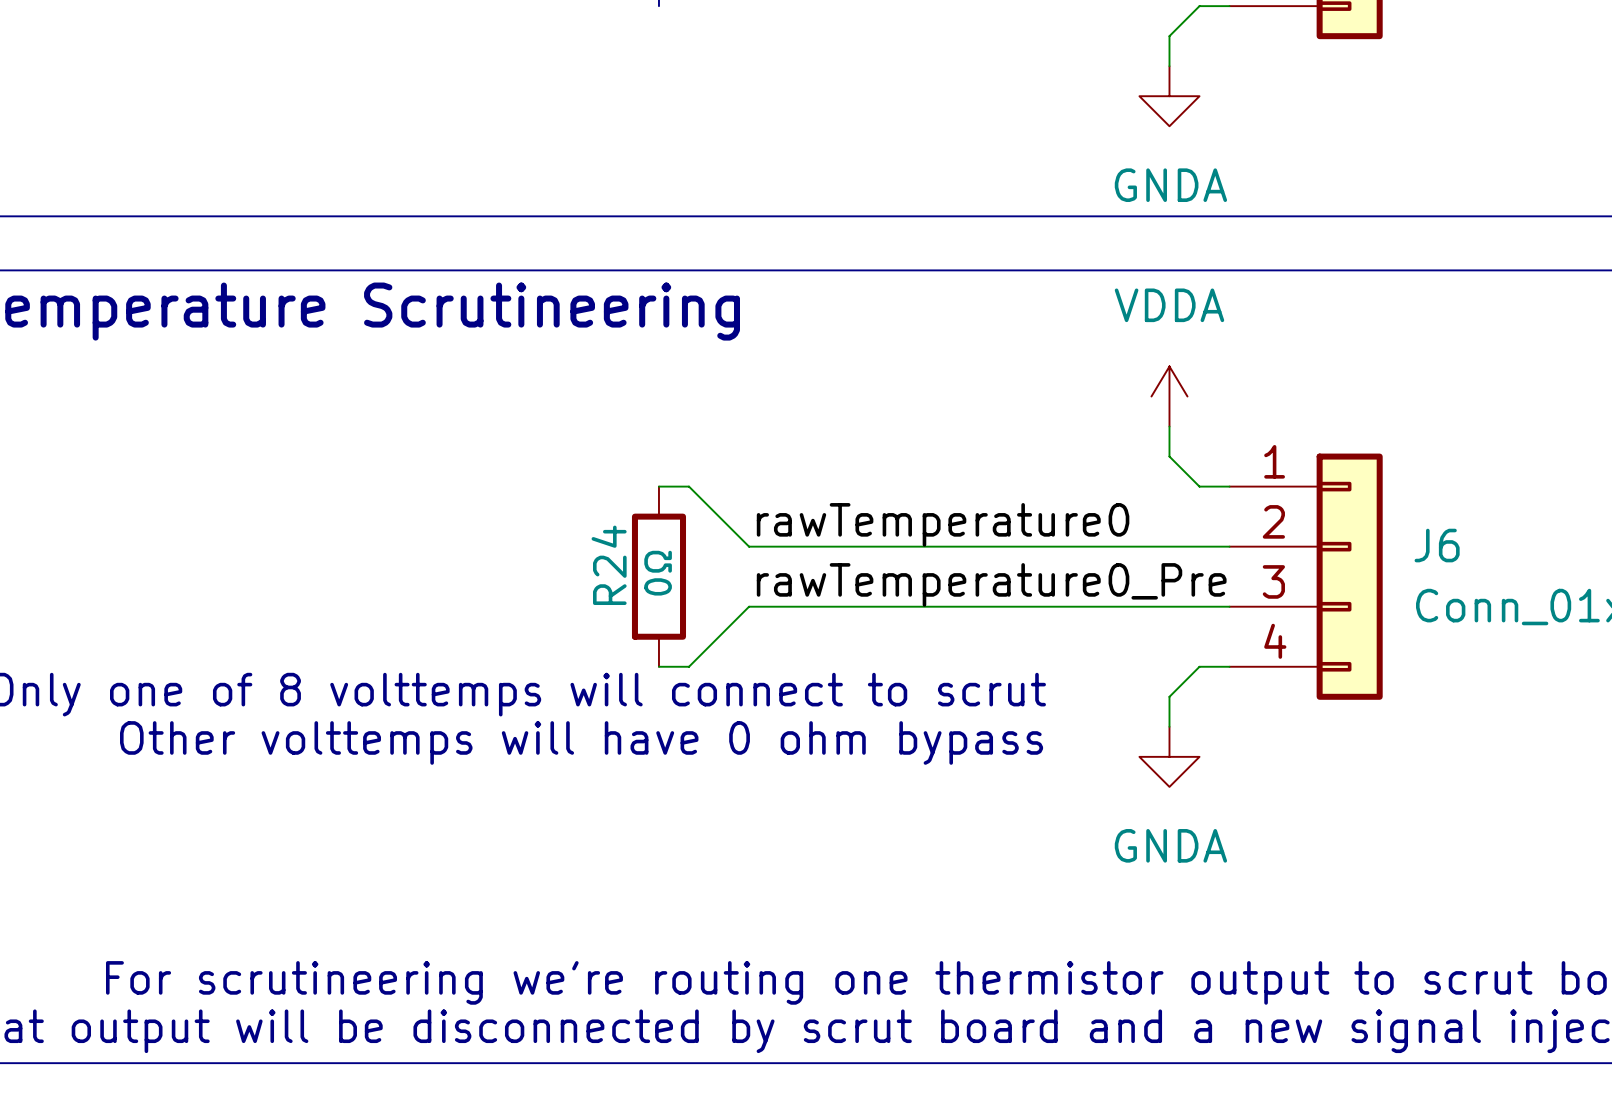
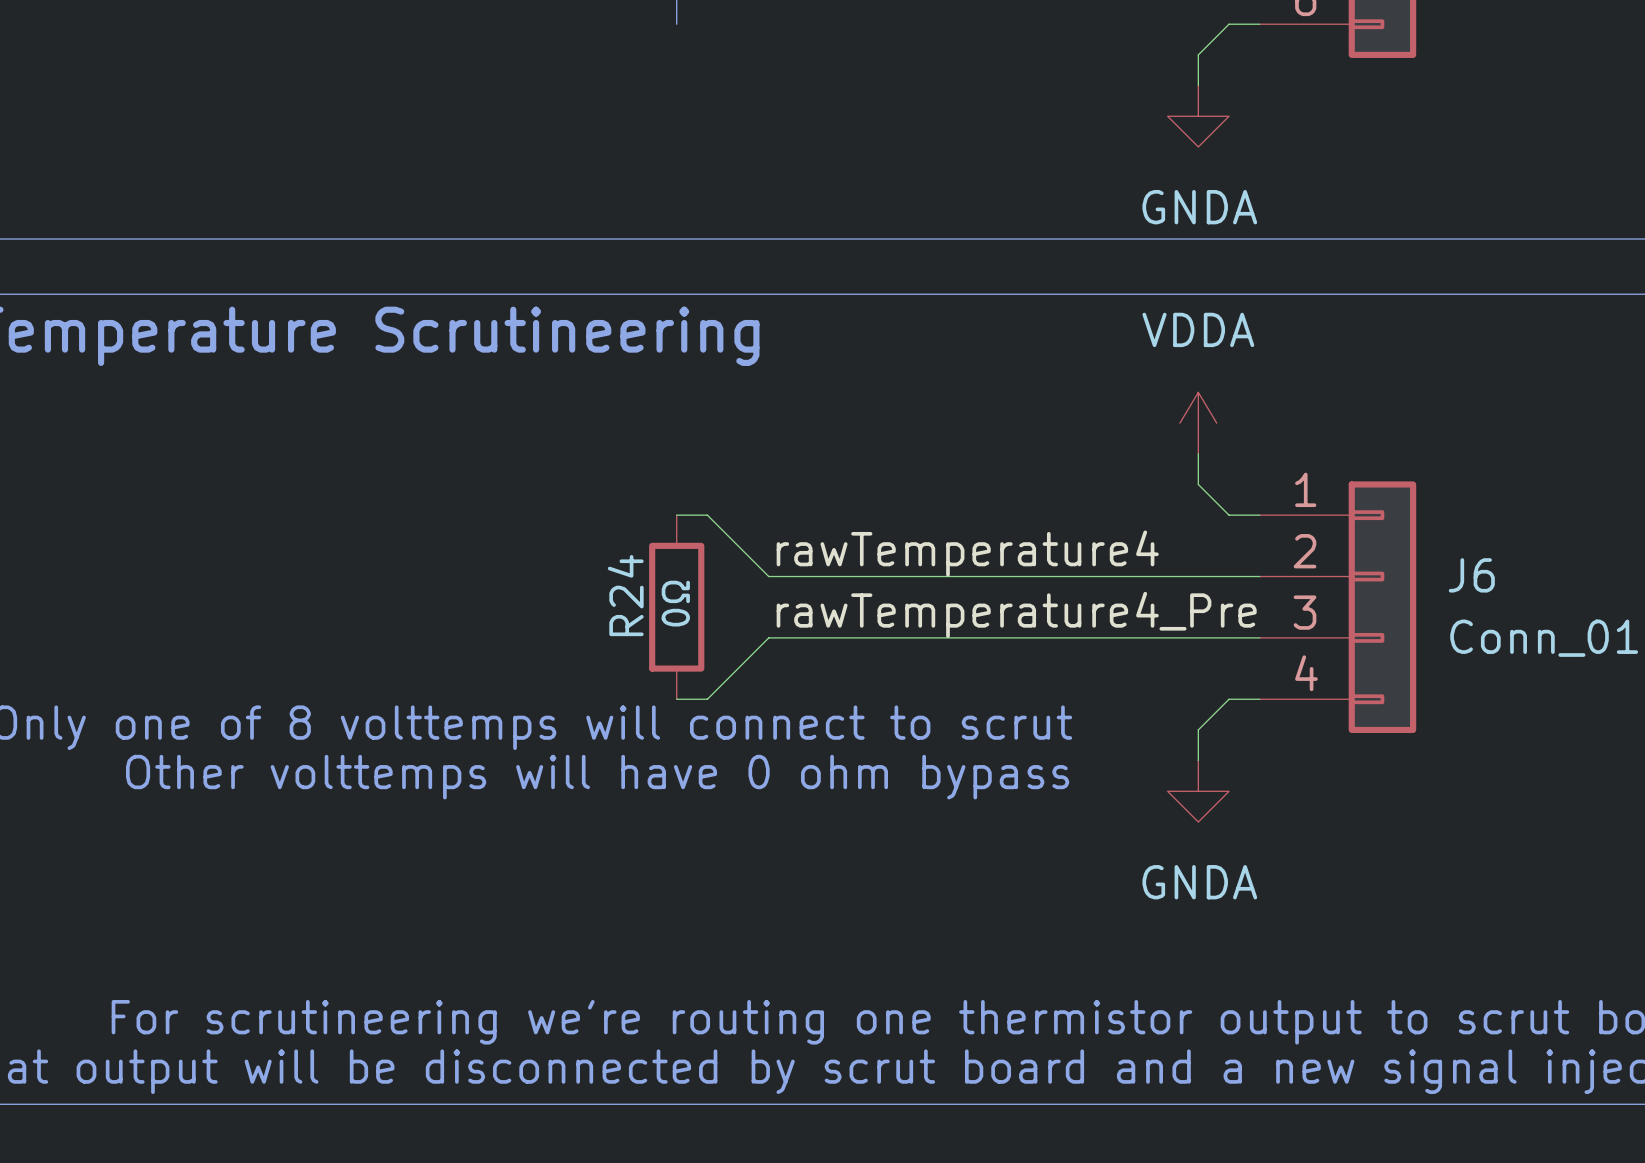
label: rawTemperature0 (943, 524) -> rawTemperature4 (967, 553)
label: rawTemperature0_Pre (991, 584) -> rawTemperature4_Pre (1016, 614)

